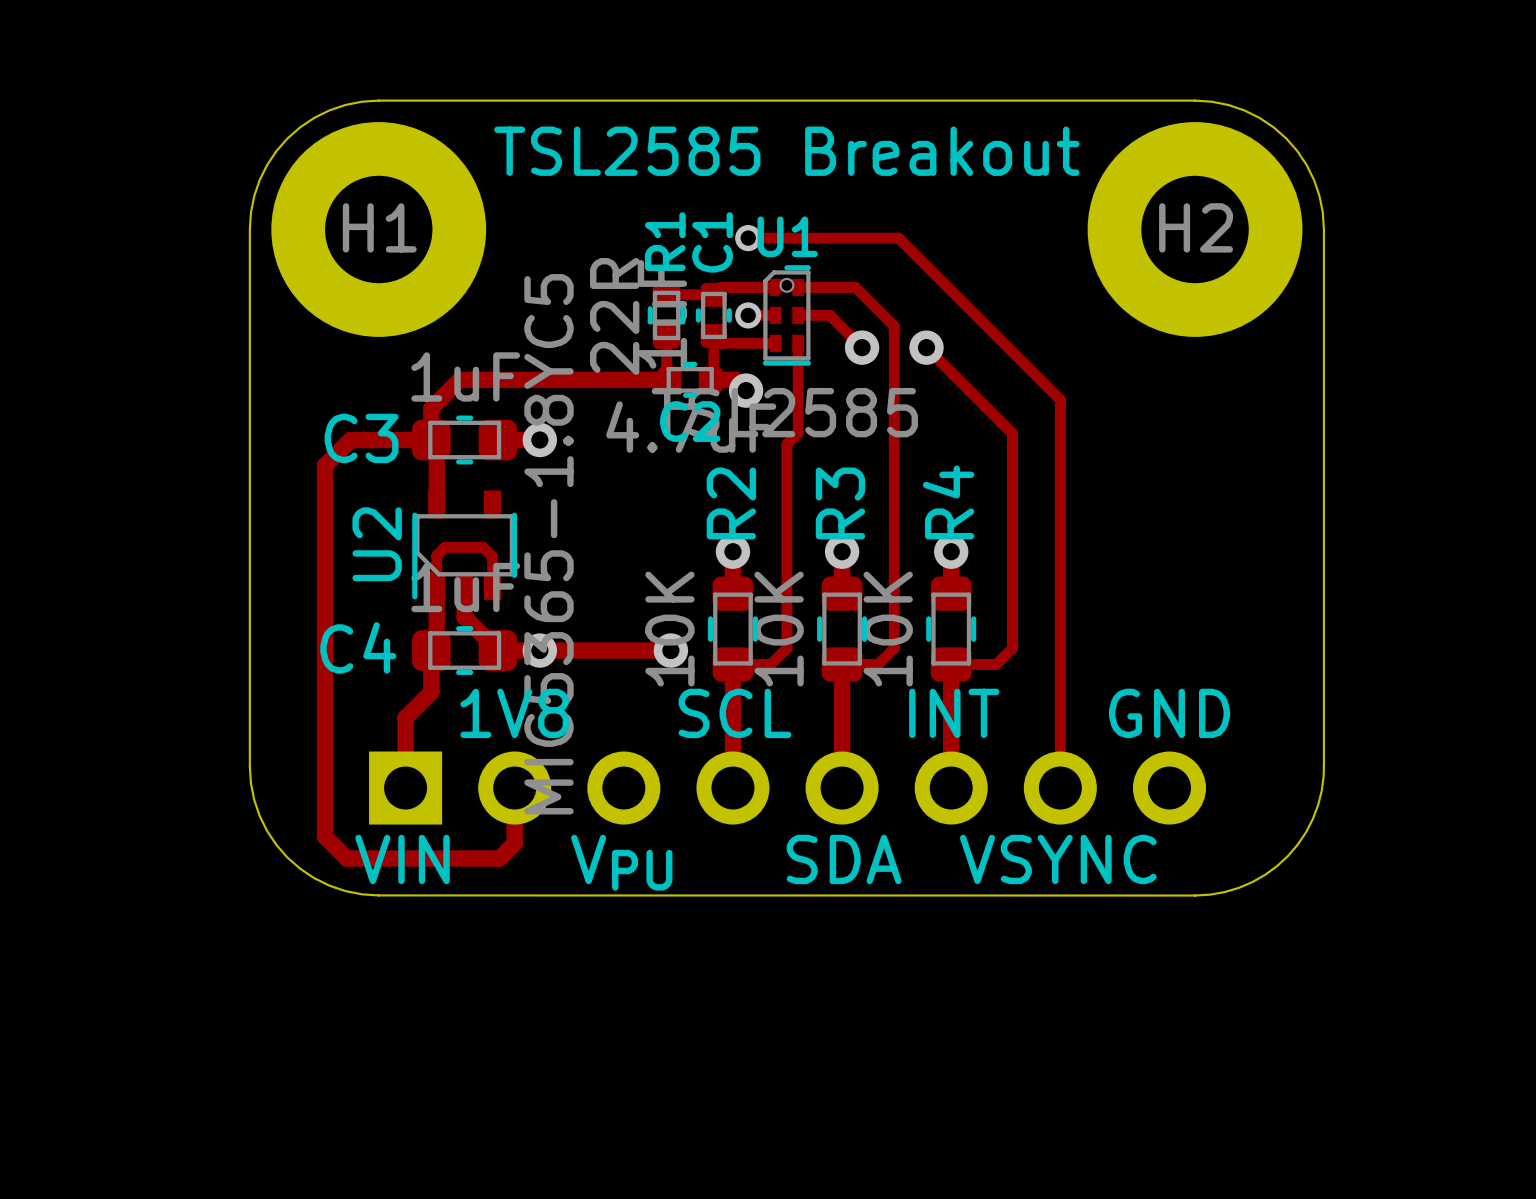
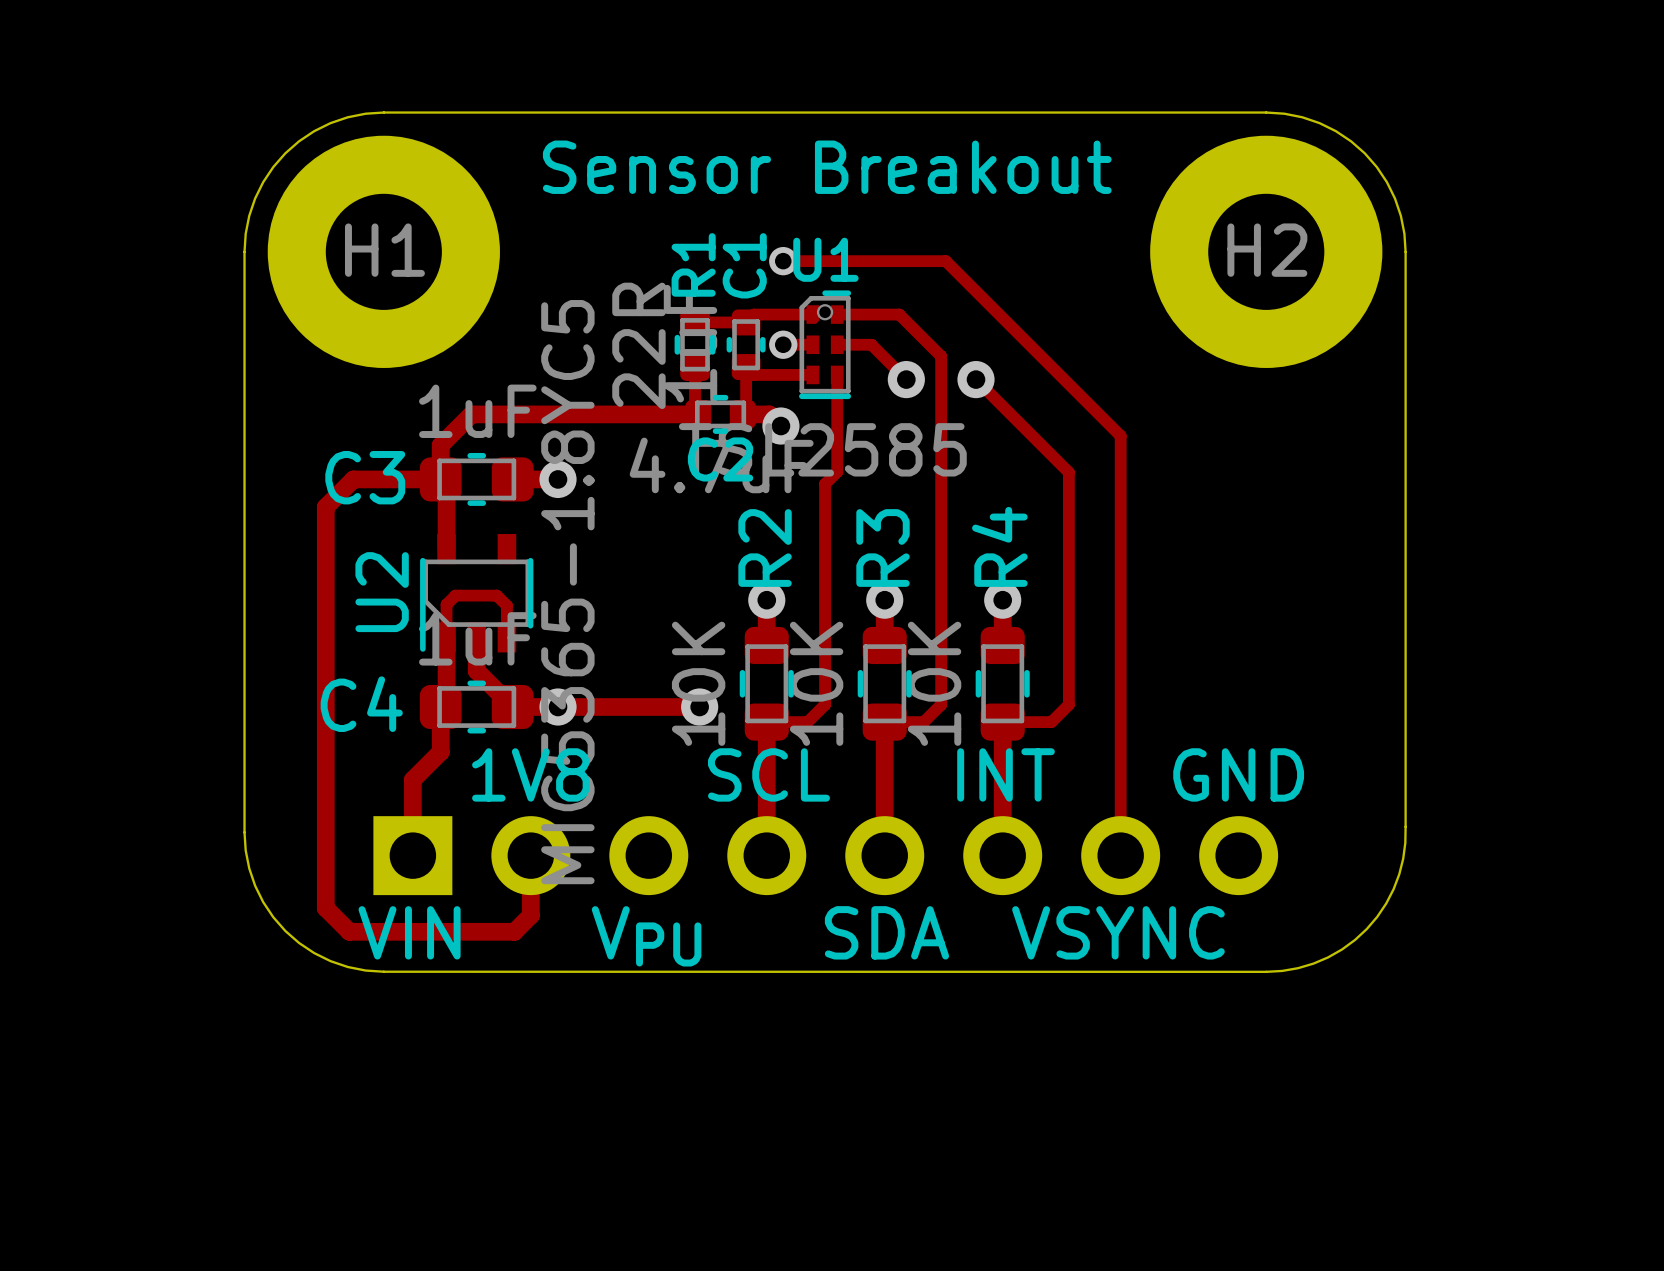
text: TSL2585 Breakout (786, 151) -> Sensor Breakout (827, 167)

